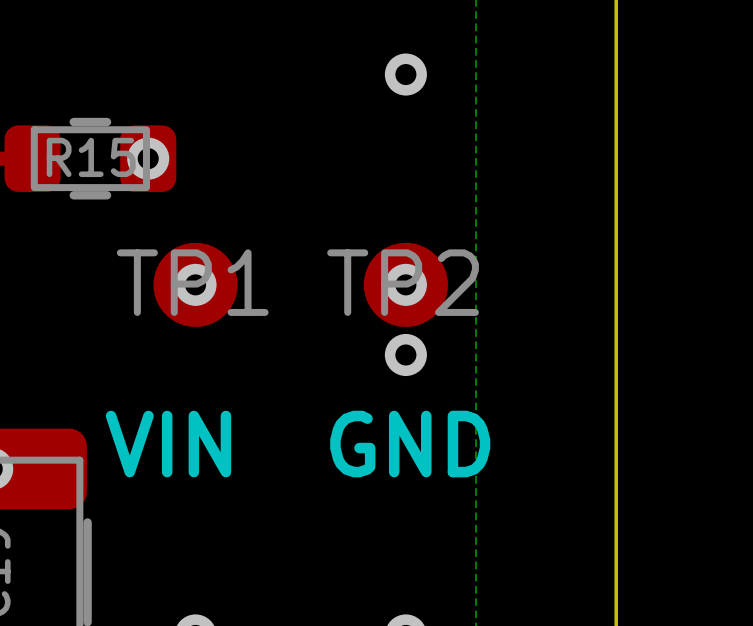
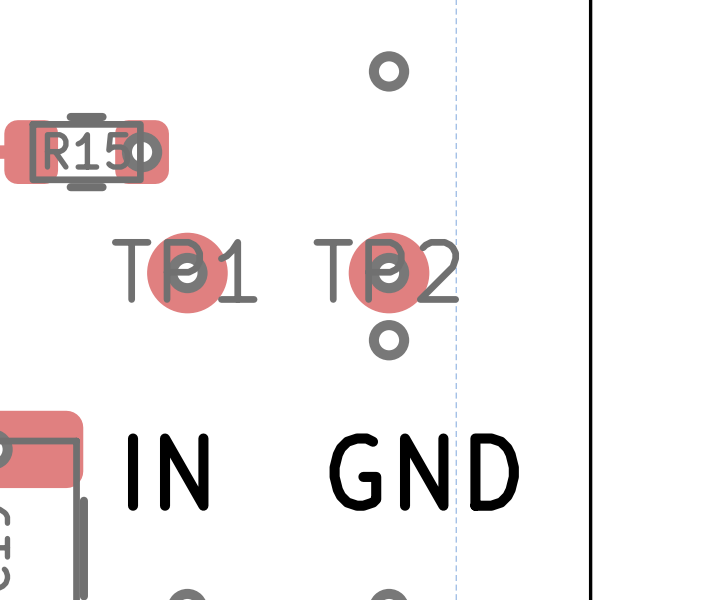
text: VIN GND (298, 444) -> IN GND (323, 472)

